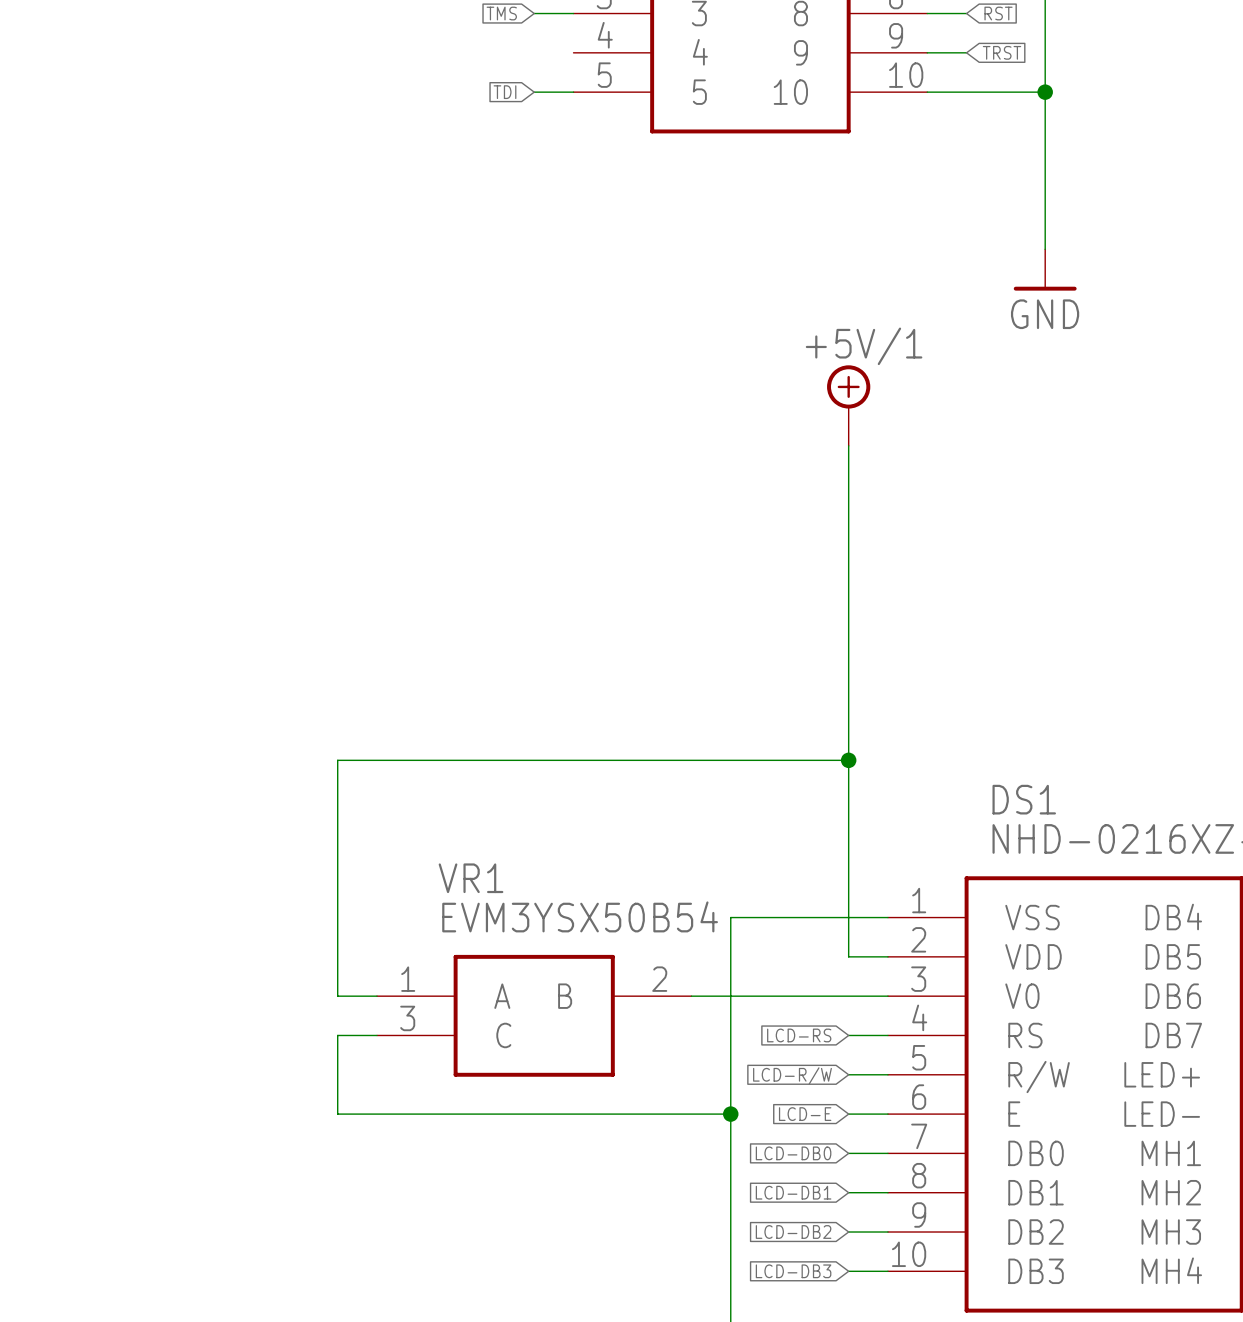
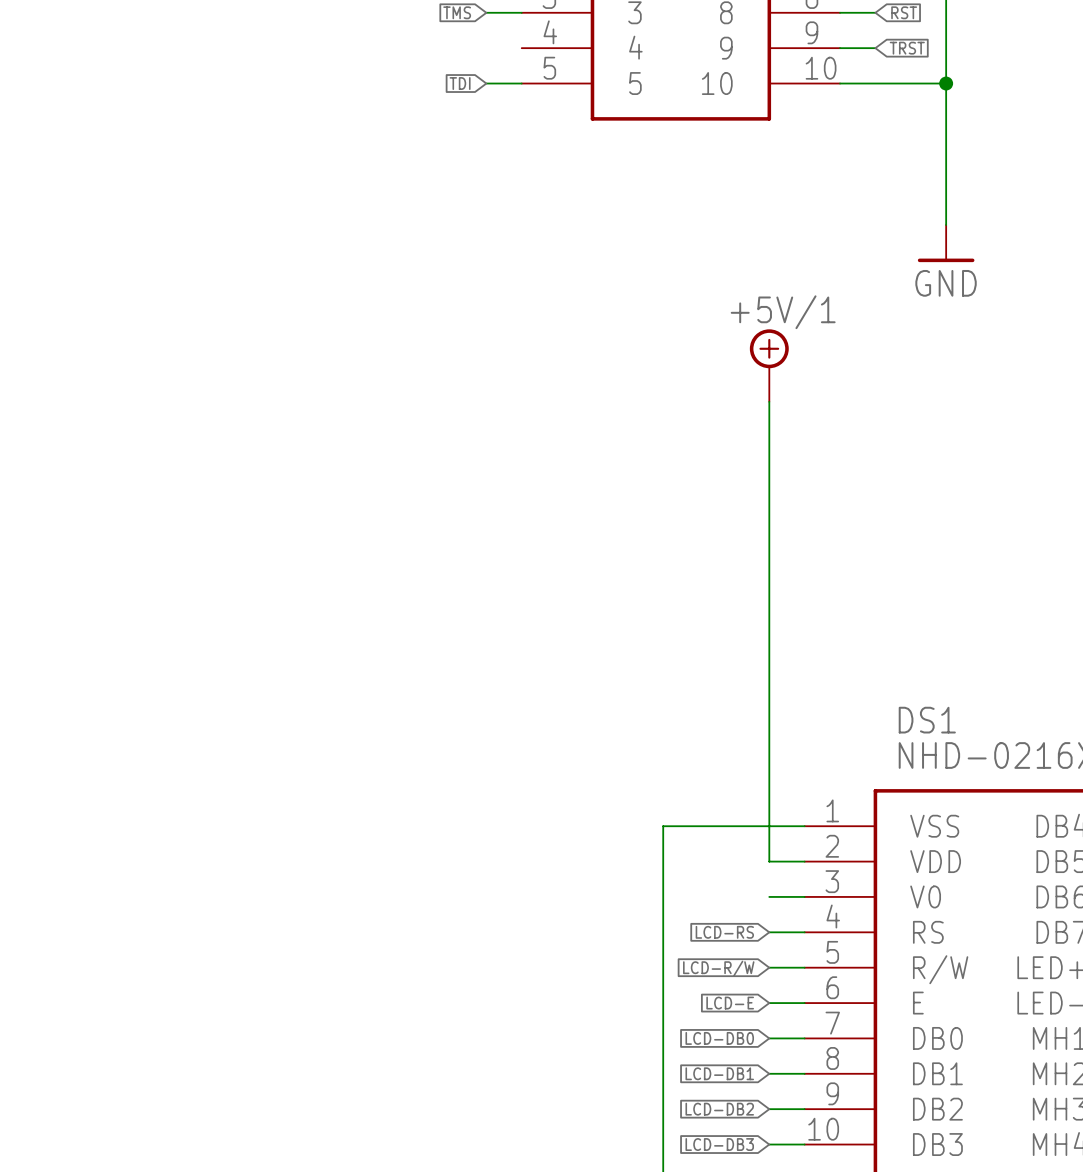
wire: (848, 760) (337, 760) (337, 996) (377, 996) -> none
junction: (848, 760) -> none
wire: (691, 996) (848, 996) -> none
VR1: EVM3YSX50B54 (534, 1015) -> none
wire: (377, 1035) (337, 1035) (337, 1114) (730, 1114) -> none
junction: (730, 1114) -> none

